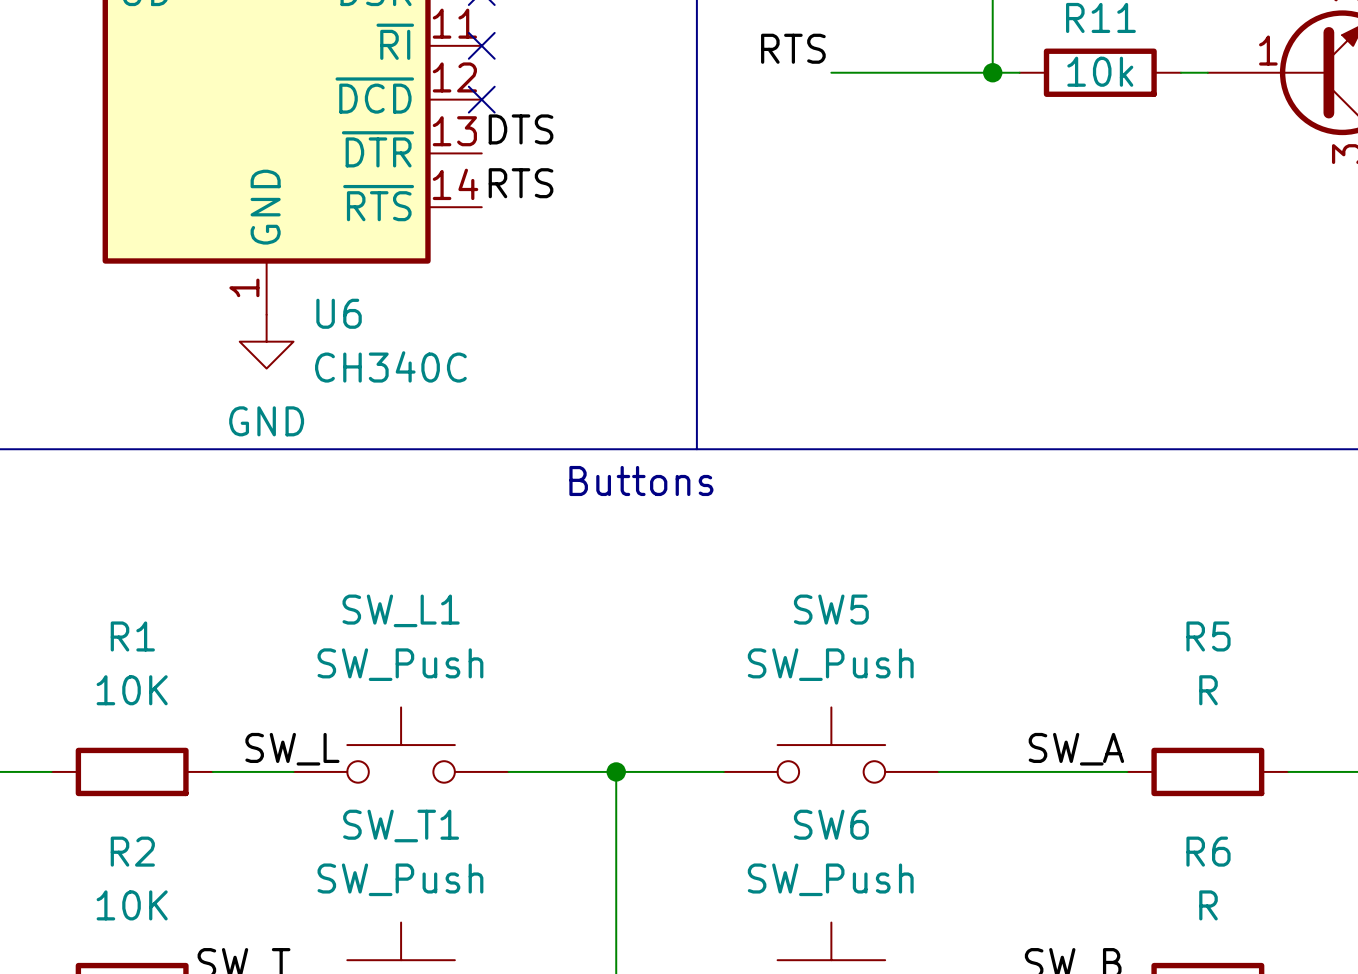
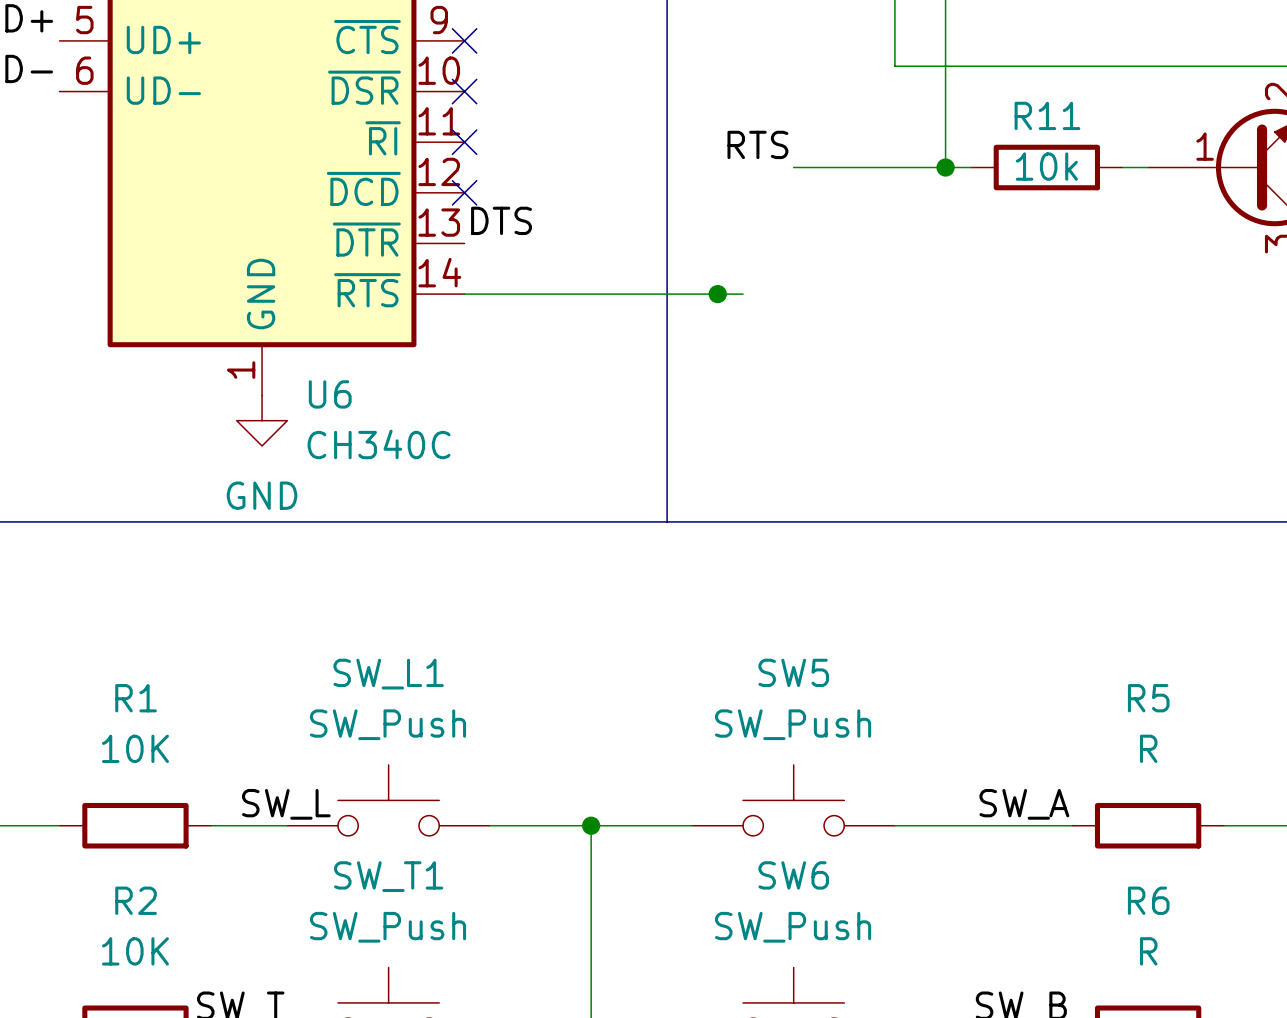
label: RTS (521, 183) -> none
wire: none -> (464, 294) (743, 294)
junction: none -> (717, 294)
text: Buttons (641, 480) -> none

